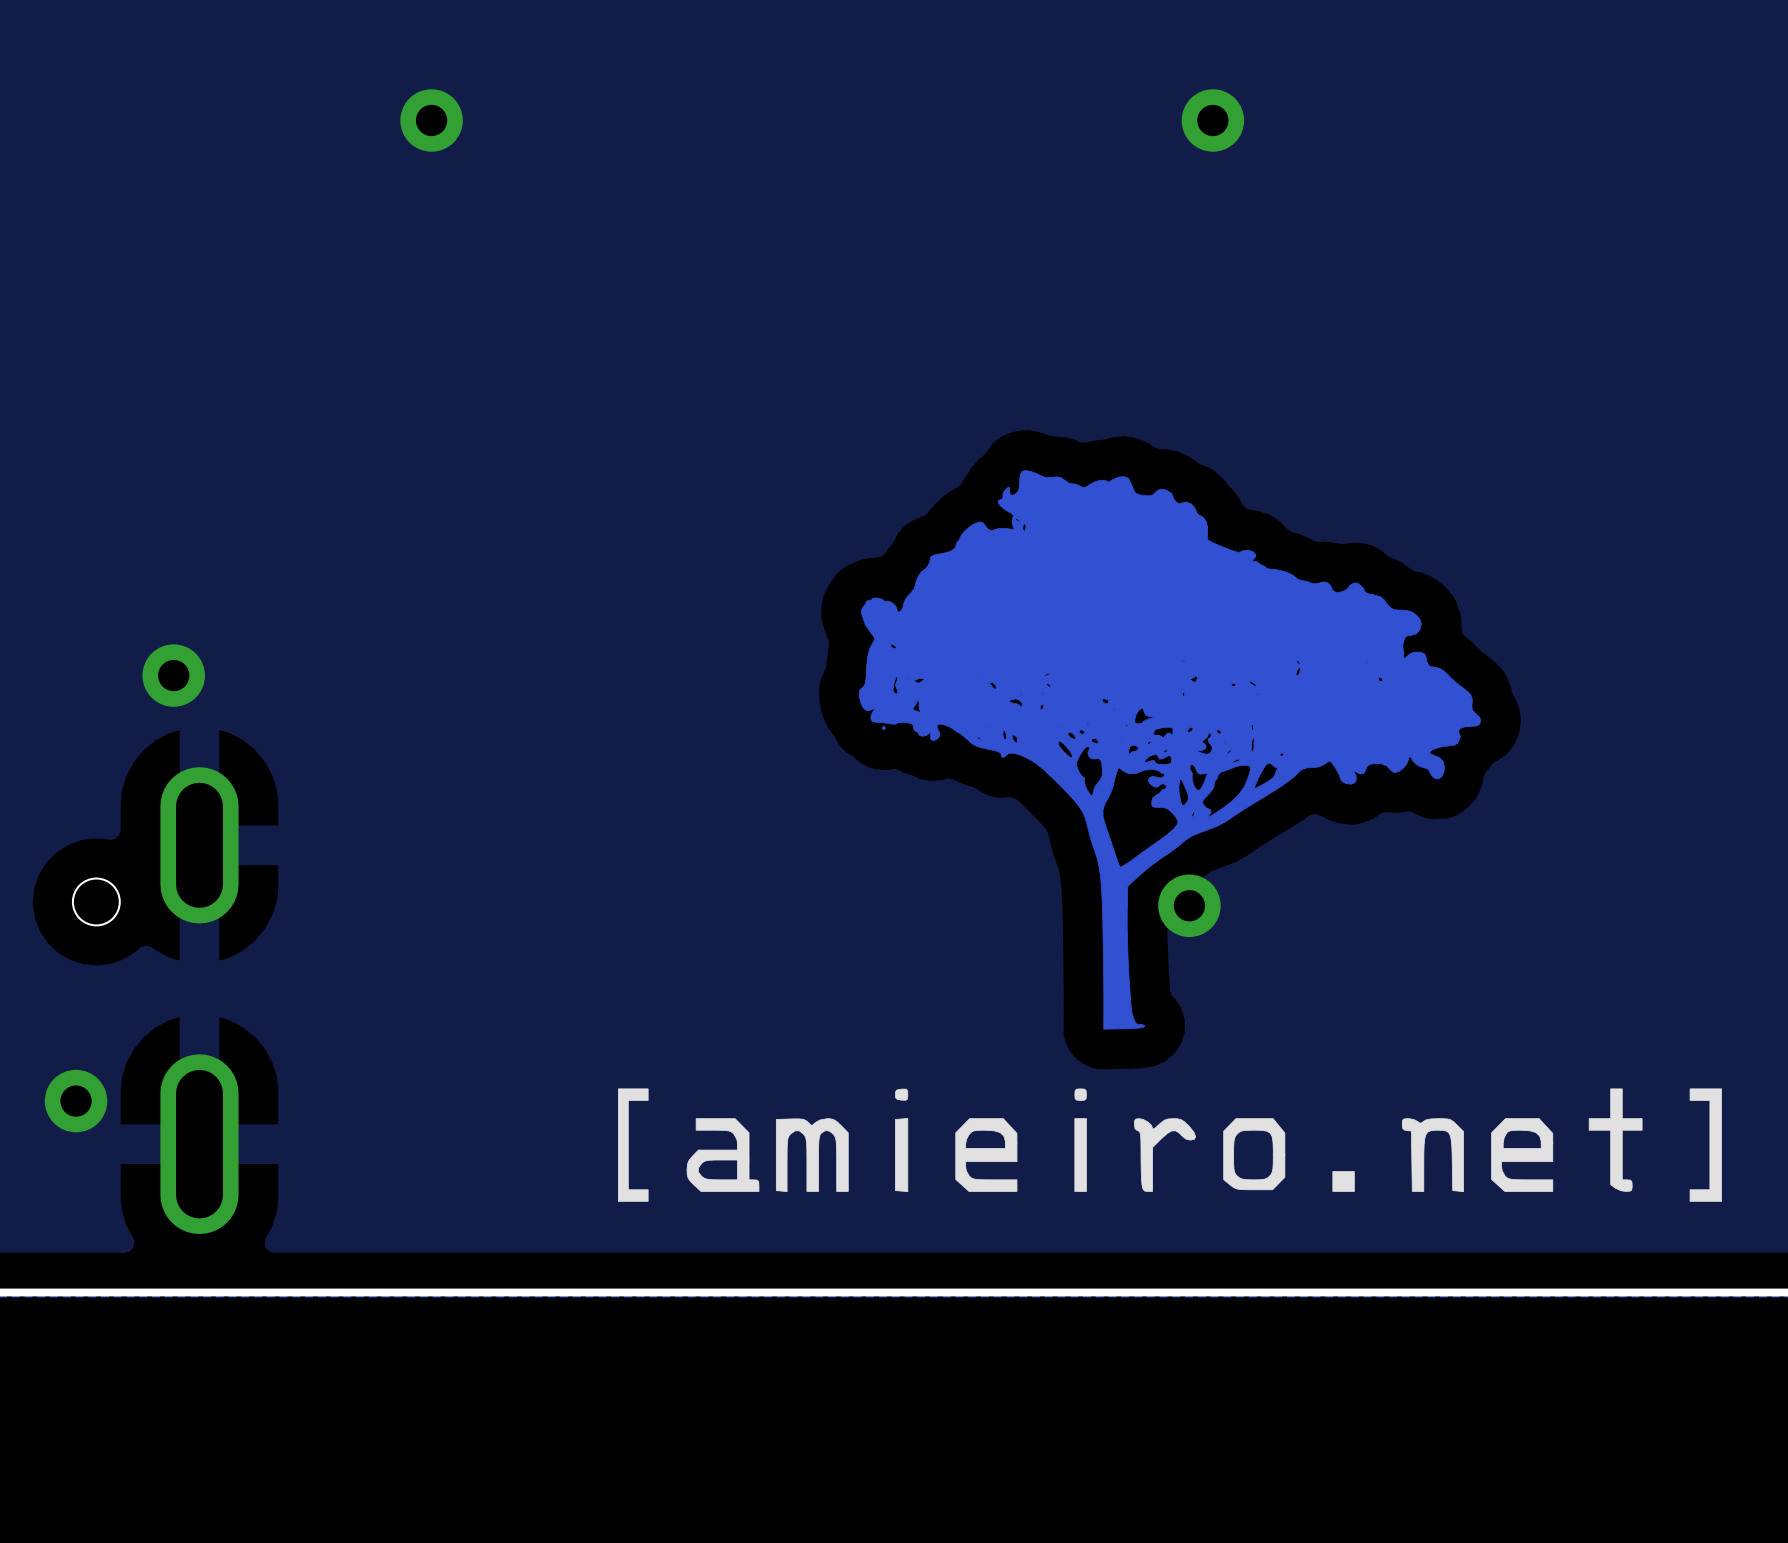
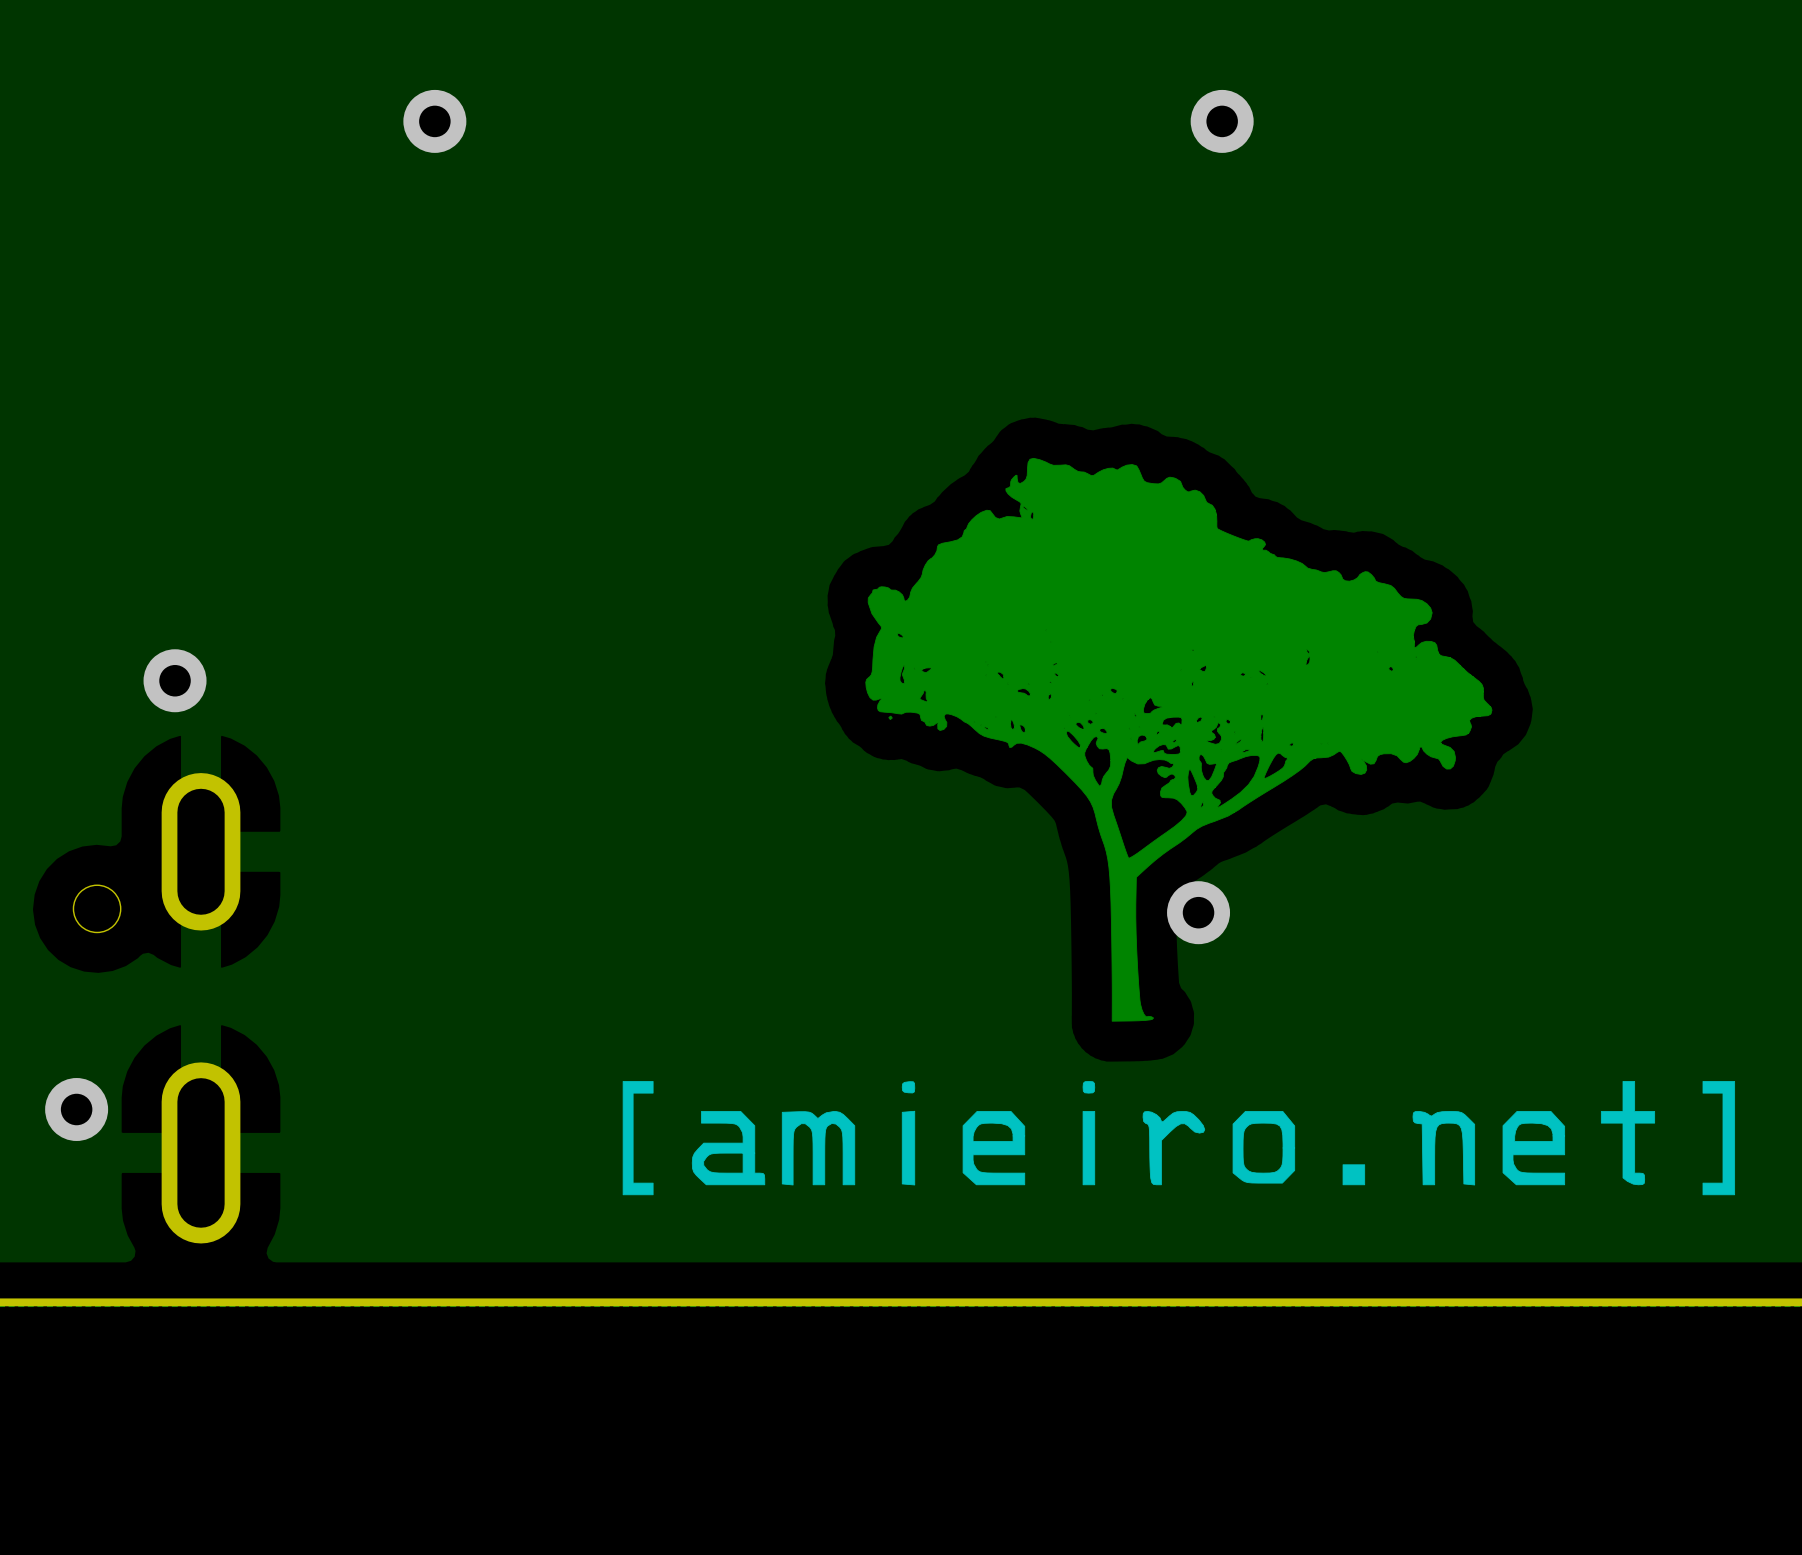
drawing position: (1169, 749) -> (1178, 739)
drawing position: (1169, 1145) -> (1178, 1138)

